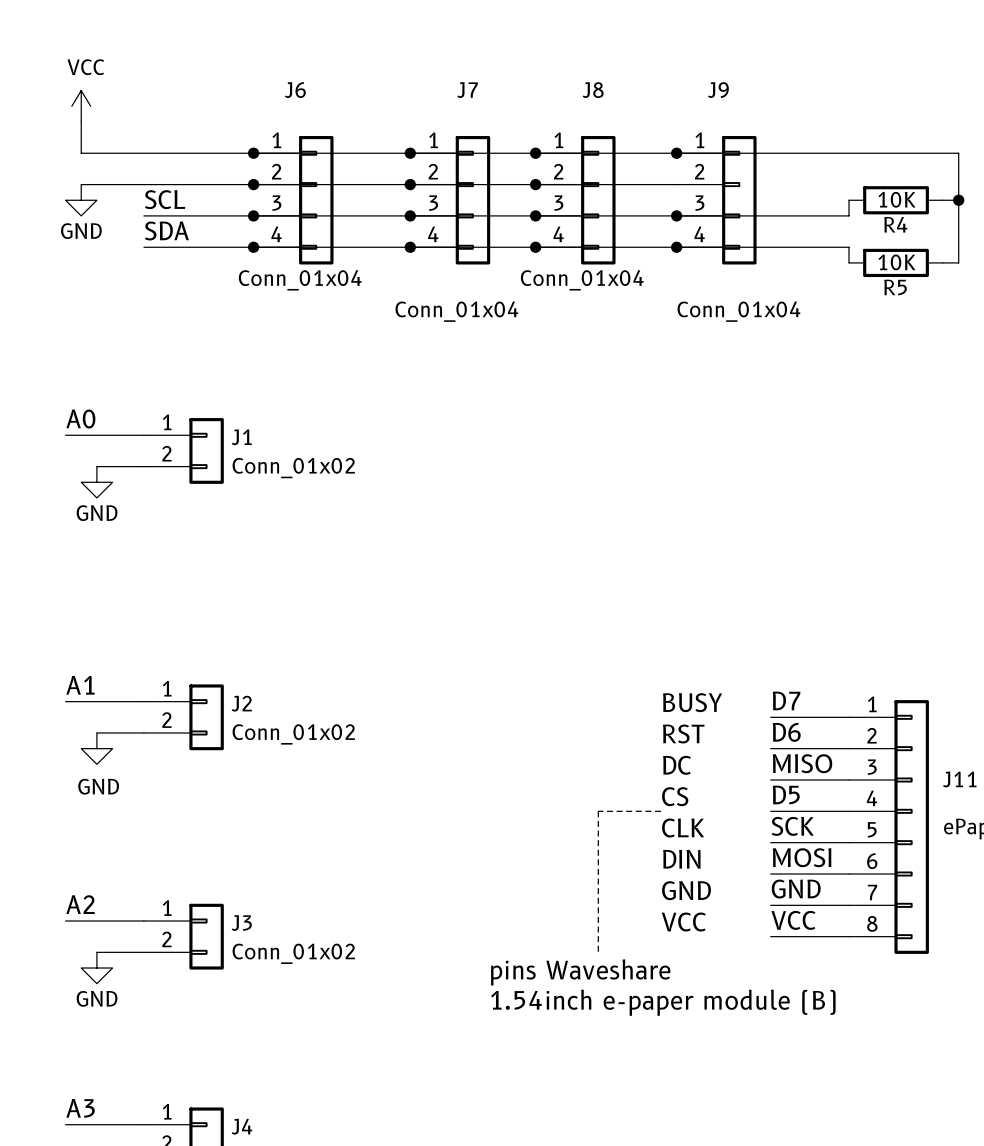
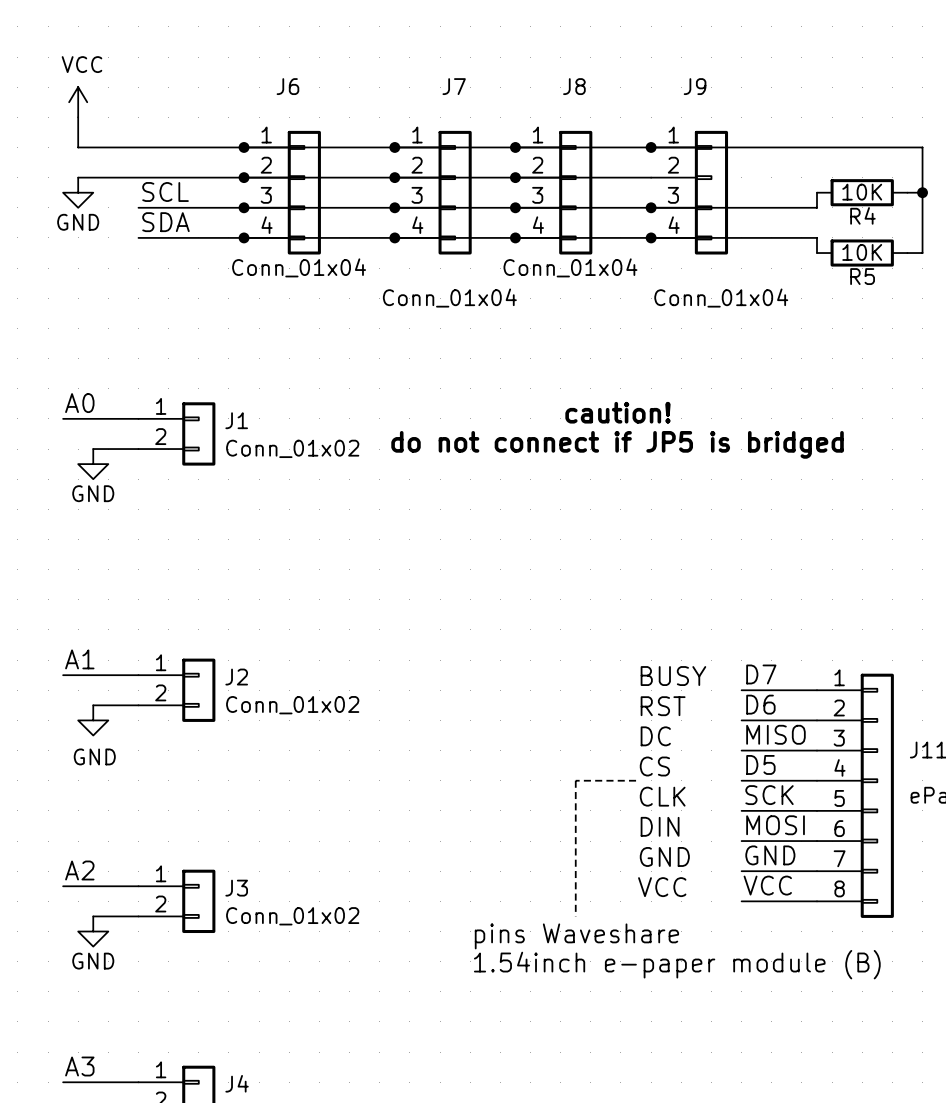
text: none -> caution! (617, 412)
text: none -> do not connect if JP5 is bridged (617, 444)

